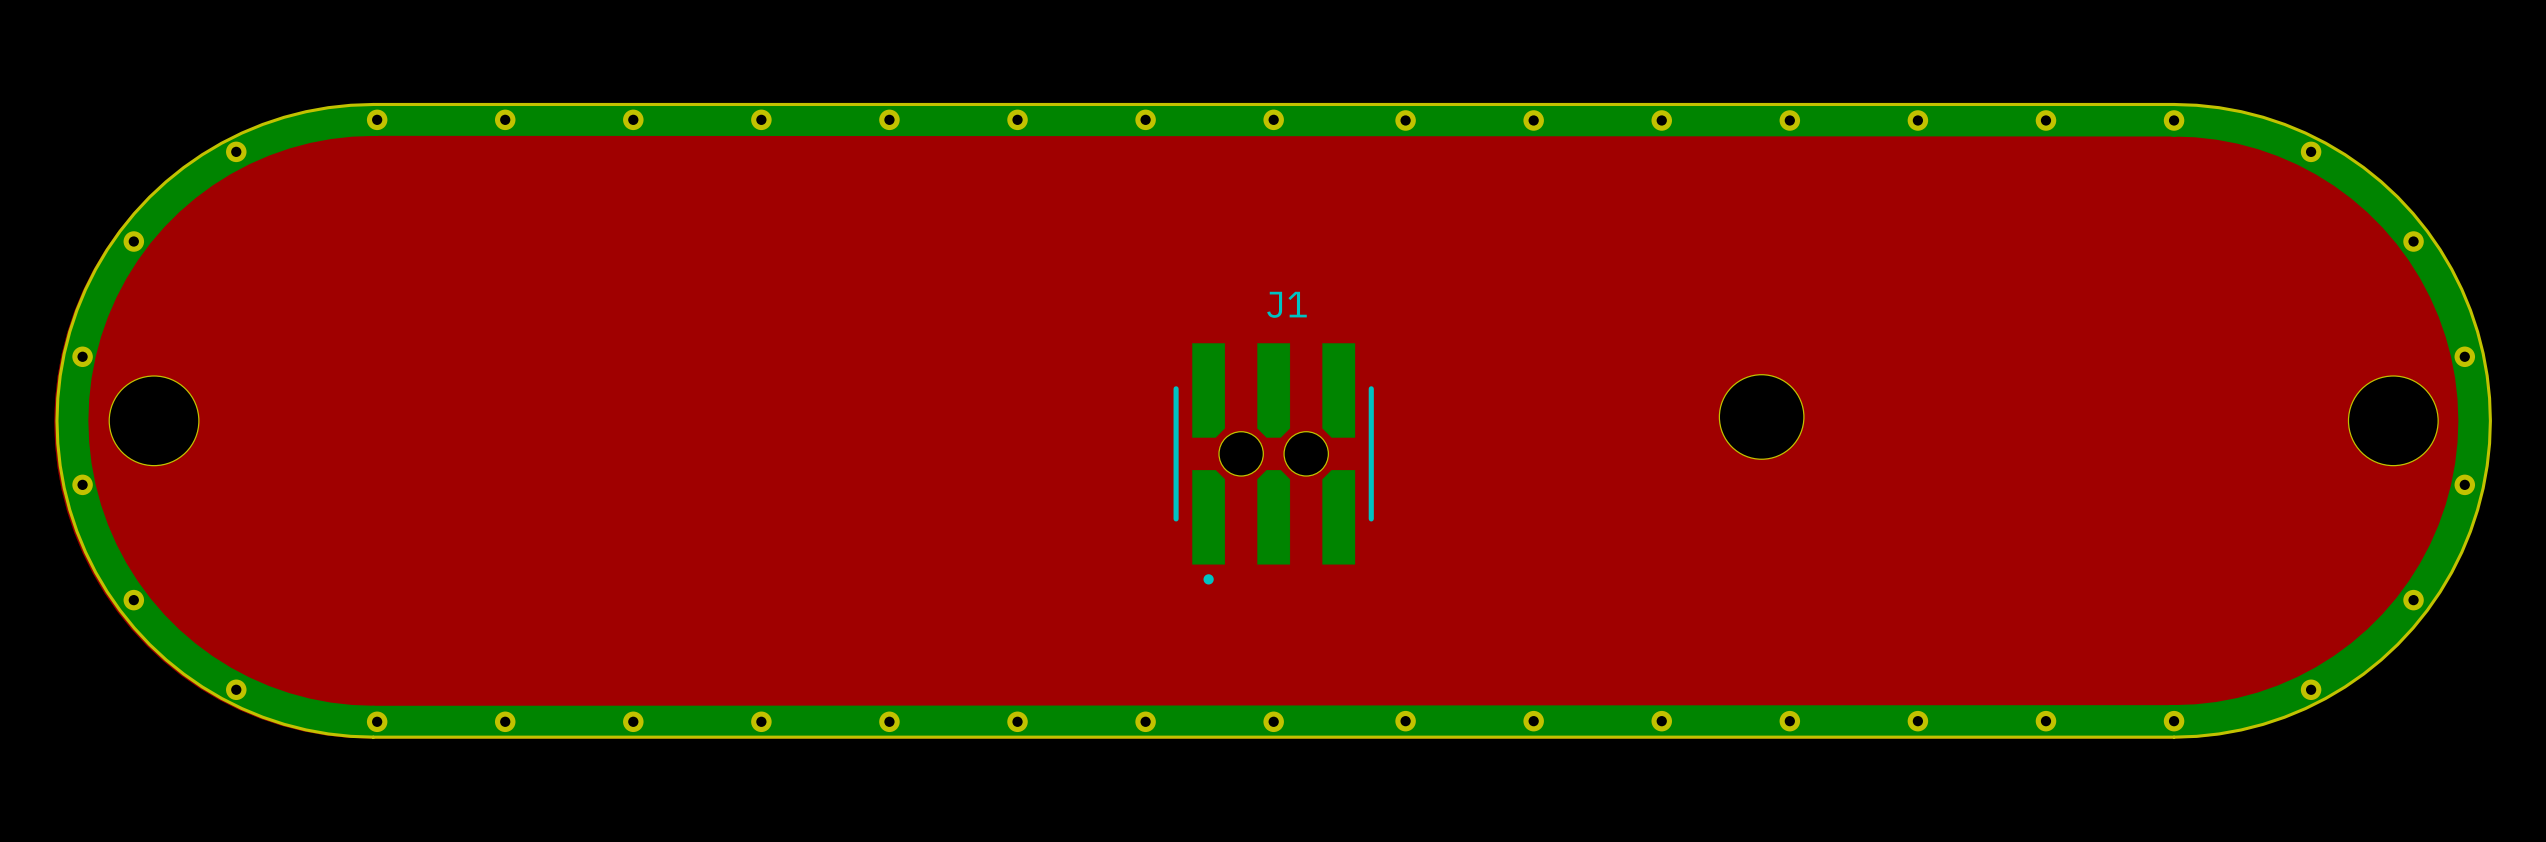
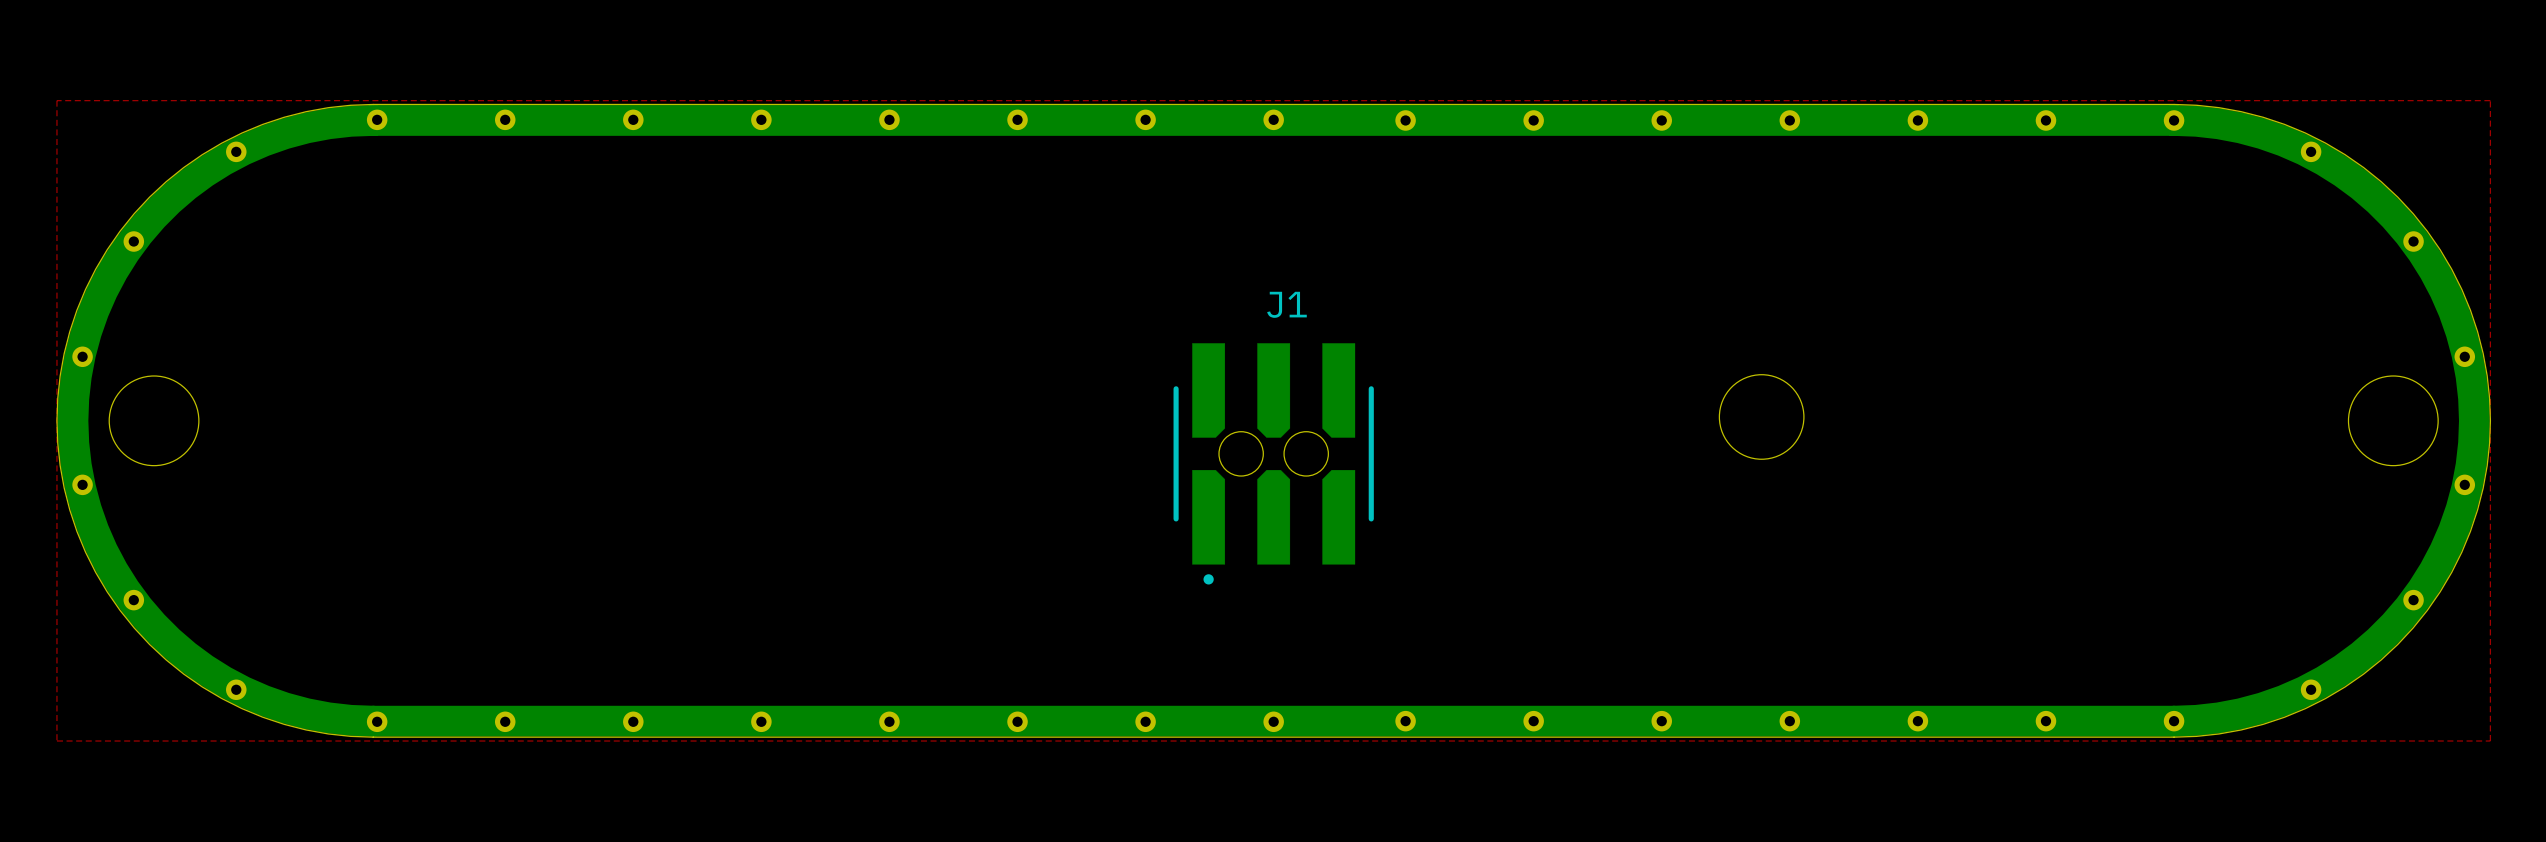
top zone outline: none -> (2490, 100) (2490, 741) (56, 741) (56, 100) (2490, 100)
J1 footprint: [54, 102, 2492, 739] -> [56, 103, 2492, 738]

